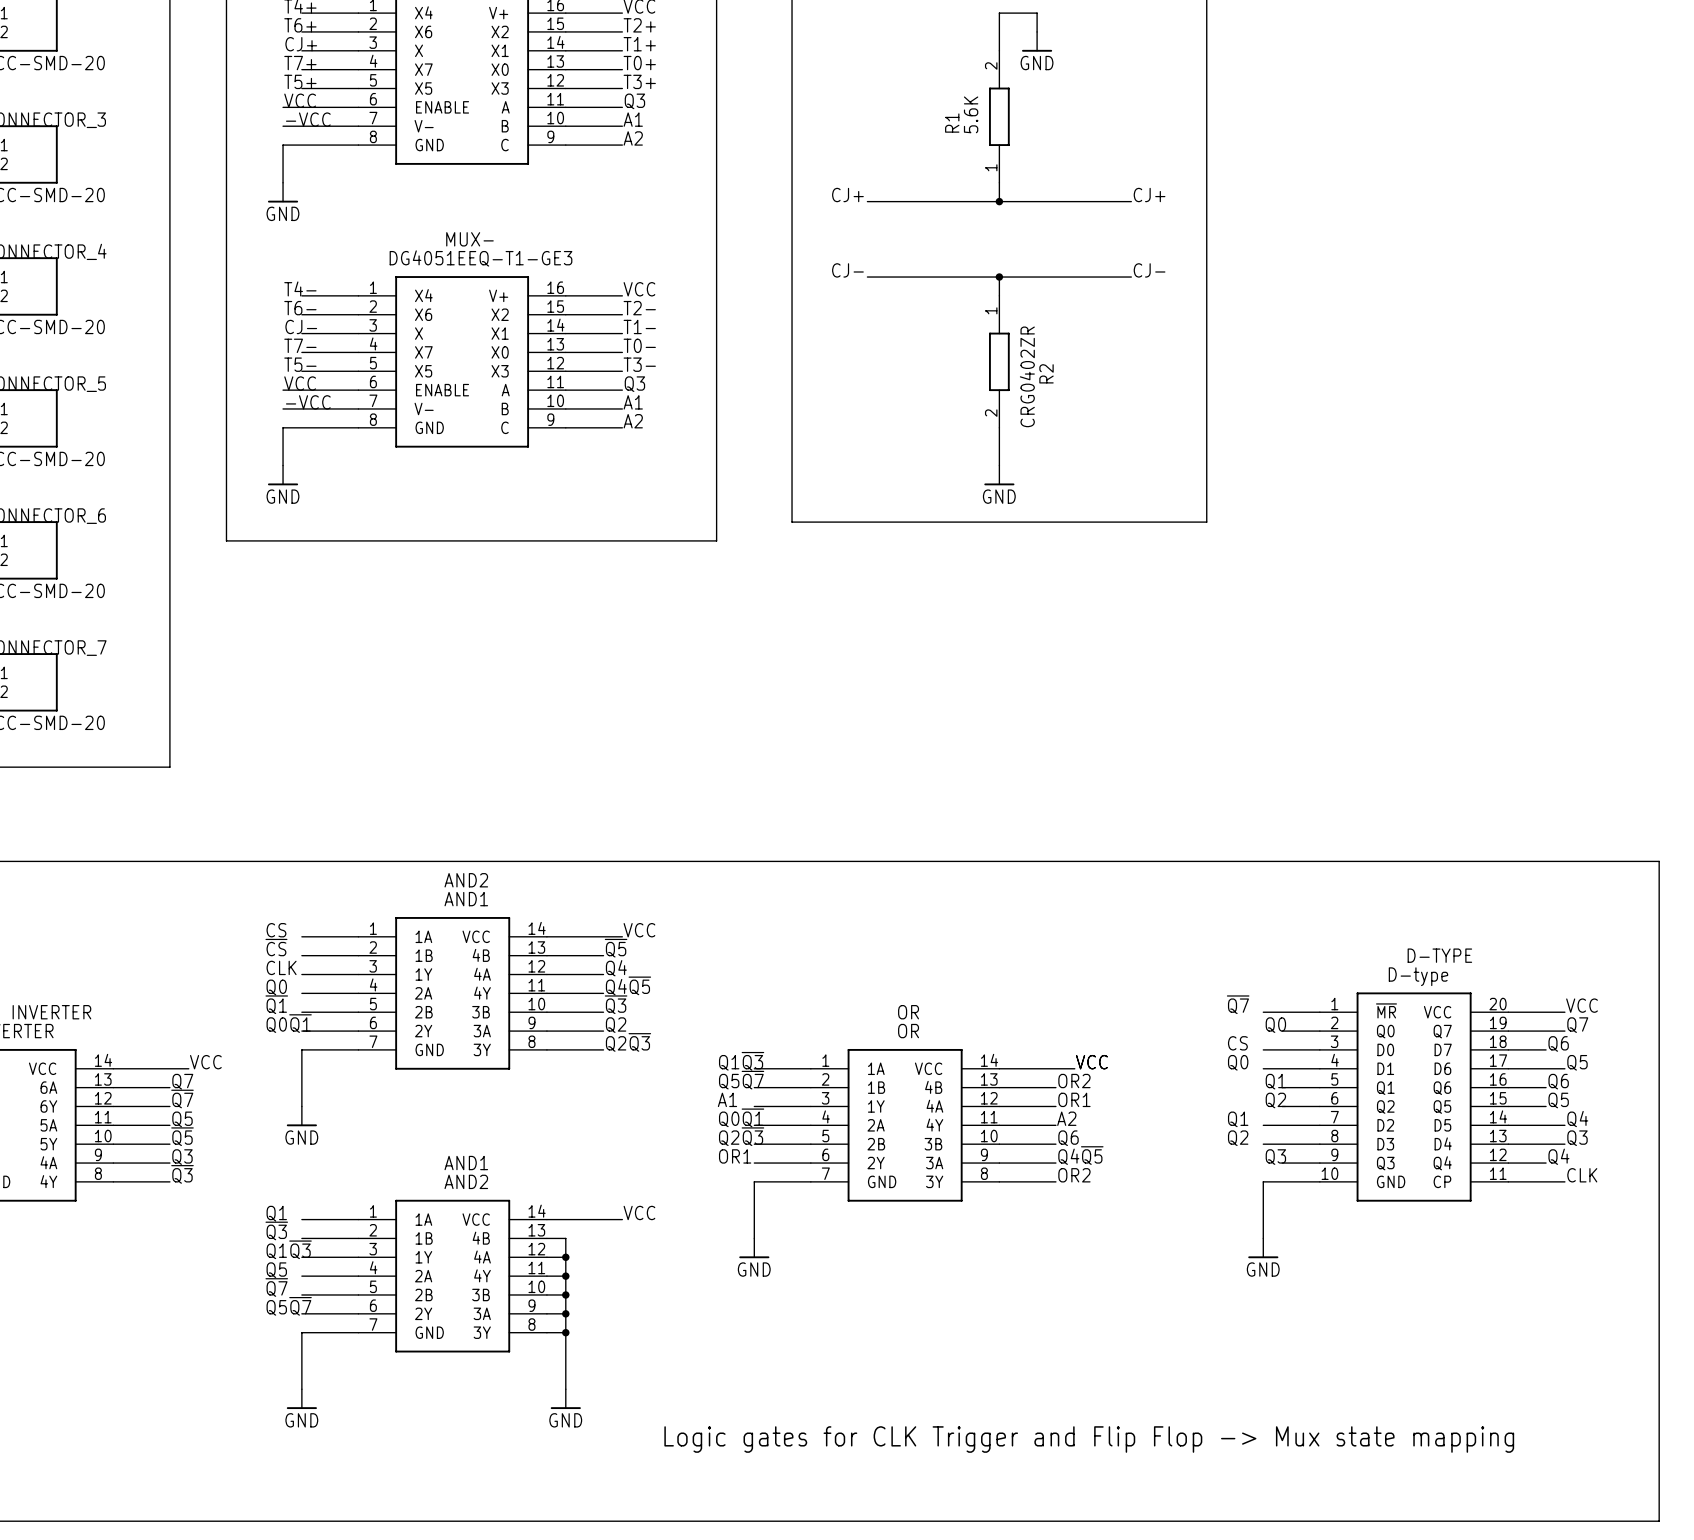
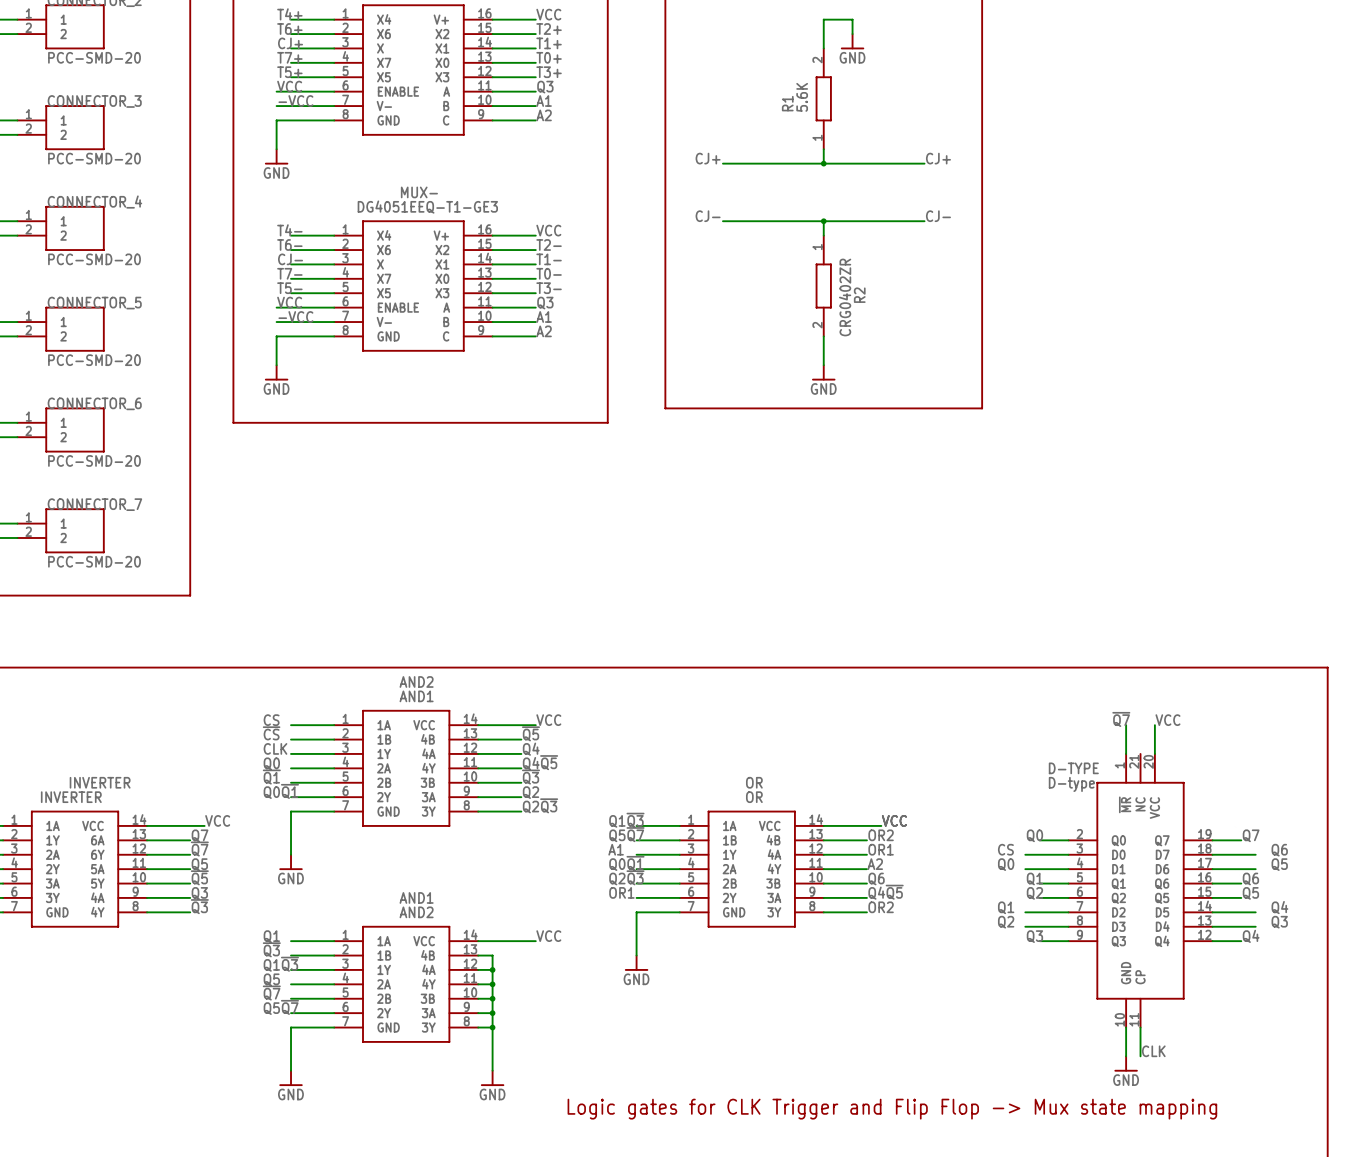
wire: none -> (1126, 725) (1126, 753)
wire: none -> (1154, 725) (1154, 753)
label position: ~{Q7} (1238, 1004) -> ~{Q7} (1121, 719)
label position: VCC (1582, 1005) -> VCC (1167, 720)
wire: (1263, 1012) (1319, 1012) -> none
wire: (1508, 1012) (1564, 1012) -> none
label: Q0 (1275, 1025) -> none
label: Q7 (1577, 1025) -> none
wire: (1282, 1031) (1319, 1031) -> none
wire: (1508, 1031) (1564, 1031) -> none
label position: CS (1237, 1043) -> CS (1005, 849)
label: Q6 (1558, 1043) -> none
wire: (1263, 1049) (1319, 1049) -> none
wire: (1508, 1049) (1546, 1049) -> (1212, 941) (1241, 941)
label: Q0 (1238, 1062) -> none
label: Q5 (1577, 1062) -> none
wire: (1263, 1068) (1319, 1068) -> (1025, 926) (1068, 926)
wire: (1508, 1068) (1564, 1068) -> (1212, 926) (1255, 926)
label: Q1 (1275, 1081) -> Q0 (1034, 835)
label: Q6 (1558, 1081) -> Q7 (1251, 835)
D-TYPE: D-type (1414, 1097) -> none
label: Q2 (1275, 1100) -> none
label: Q5 (1558, 1100) -> none
label: none -> Q6 (1279, 850)
label: Q1 (1238, 1119) -> Q0 (1006, 864)
label: Q4 (1577, 1119) -> none
label: none -> Q5 (1279, 864)
label: Q2 (1238, 1138) -> none
label: none -> Q1 (1034, 879)
label: none -> Q6 (1250, 879)
label position: Q3 (1577, 1138) -> Q3 (1279, 922)
D-TYPE: none -> D-type (1140, 890)
label: Q4 (1558, 1156) -> Q5 (1250, 893)
label: Q3 (1275, 1157) -> Q2 (1034, 893)
label: none -> Q1 (1006, 907)
label: CLK (1582, 1175) -> none
label: none -> Q4 (1279, 907)
wire: (1263, 1181) (1263, 1238) -> none
label: none -> Q2 (1006, 922)
label: none -> Q3 (1034, 936)
label: none -> Q4 (1251, 936)
wire: none -> (1039, 941) (1068, 941)
power symbol: GND (1263, 1248) -> none
wire: none -> (1126, 1027) (1126, 1056)
wire: none -> (1140, 1027) (1140, 1056)
label: none -> CLK (1153, 1051)
power symbol: none -> GND (1126, 1063)

